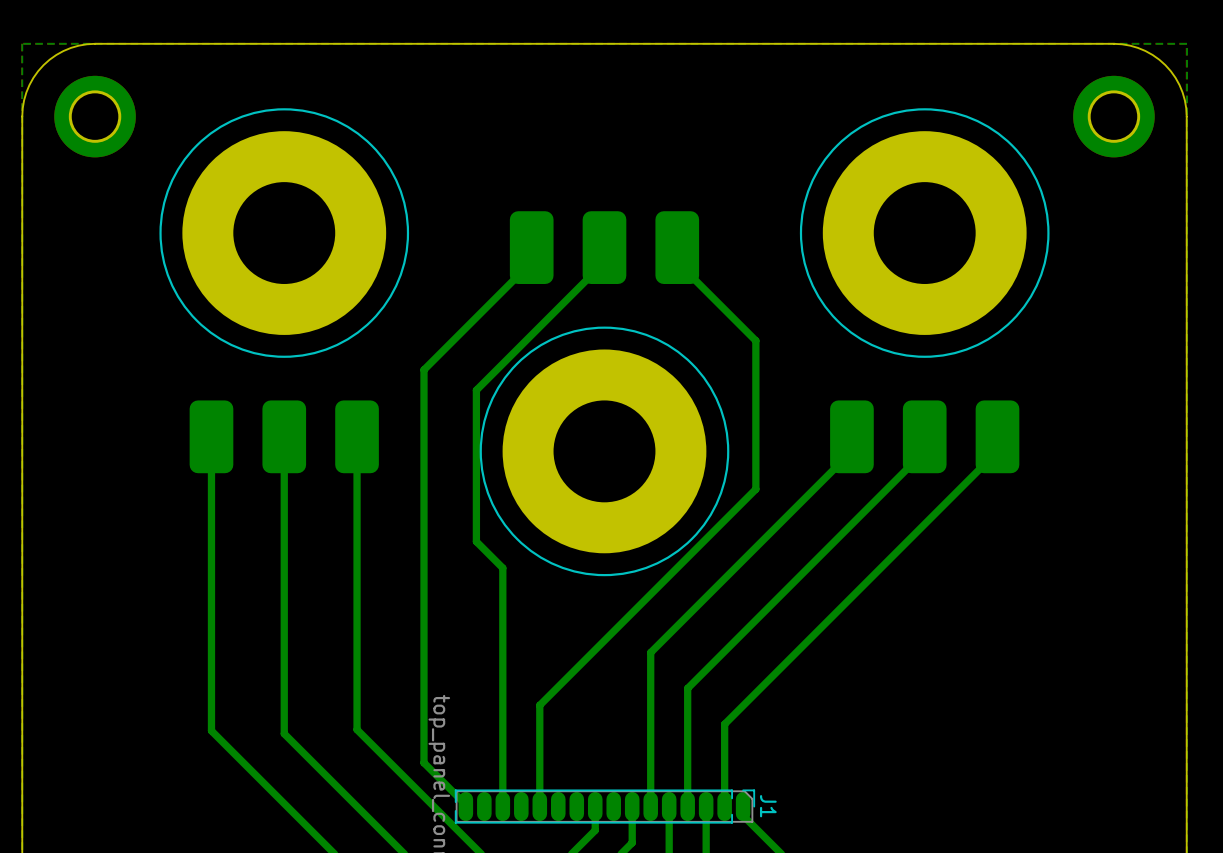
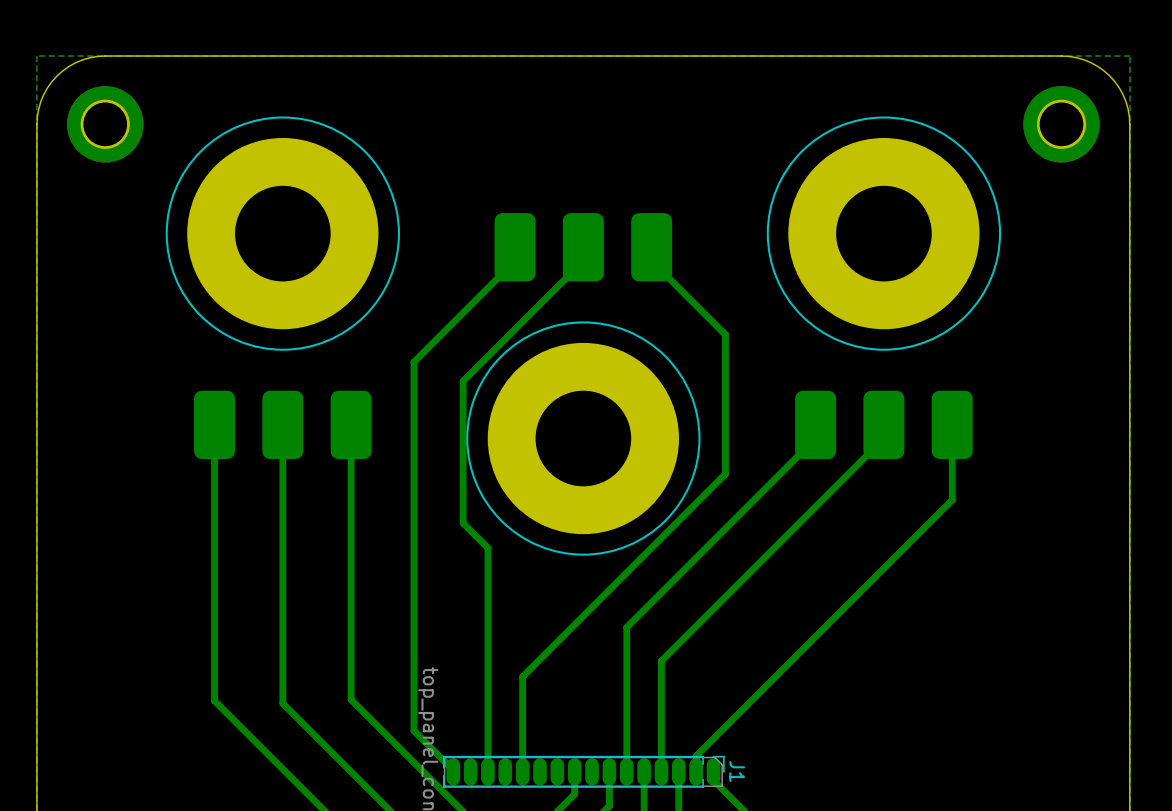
bottom track: (997, 451) (724, 724) (724, 789) -> (952, 438) (952, 500) (696, 756)

